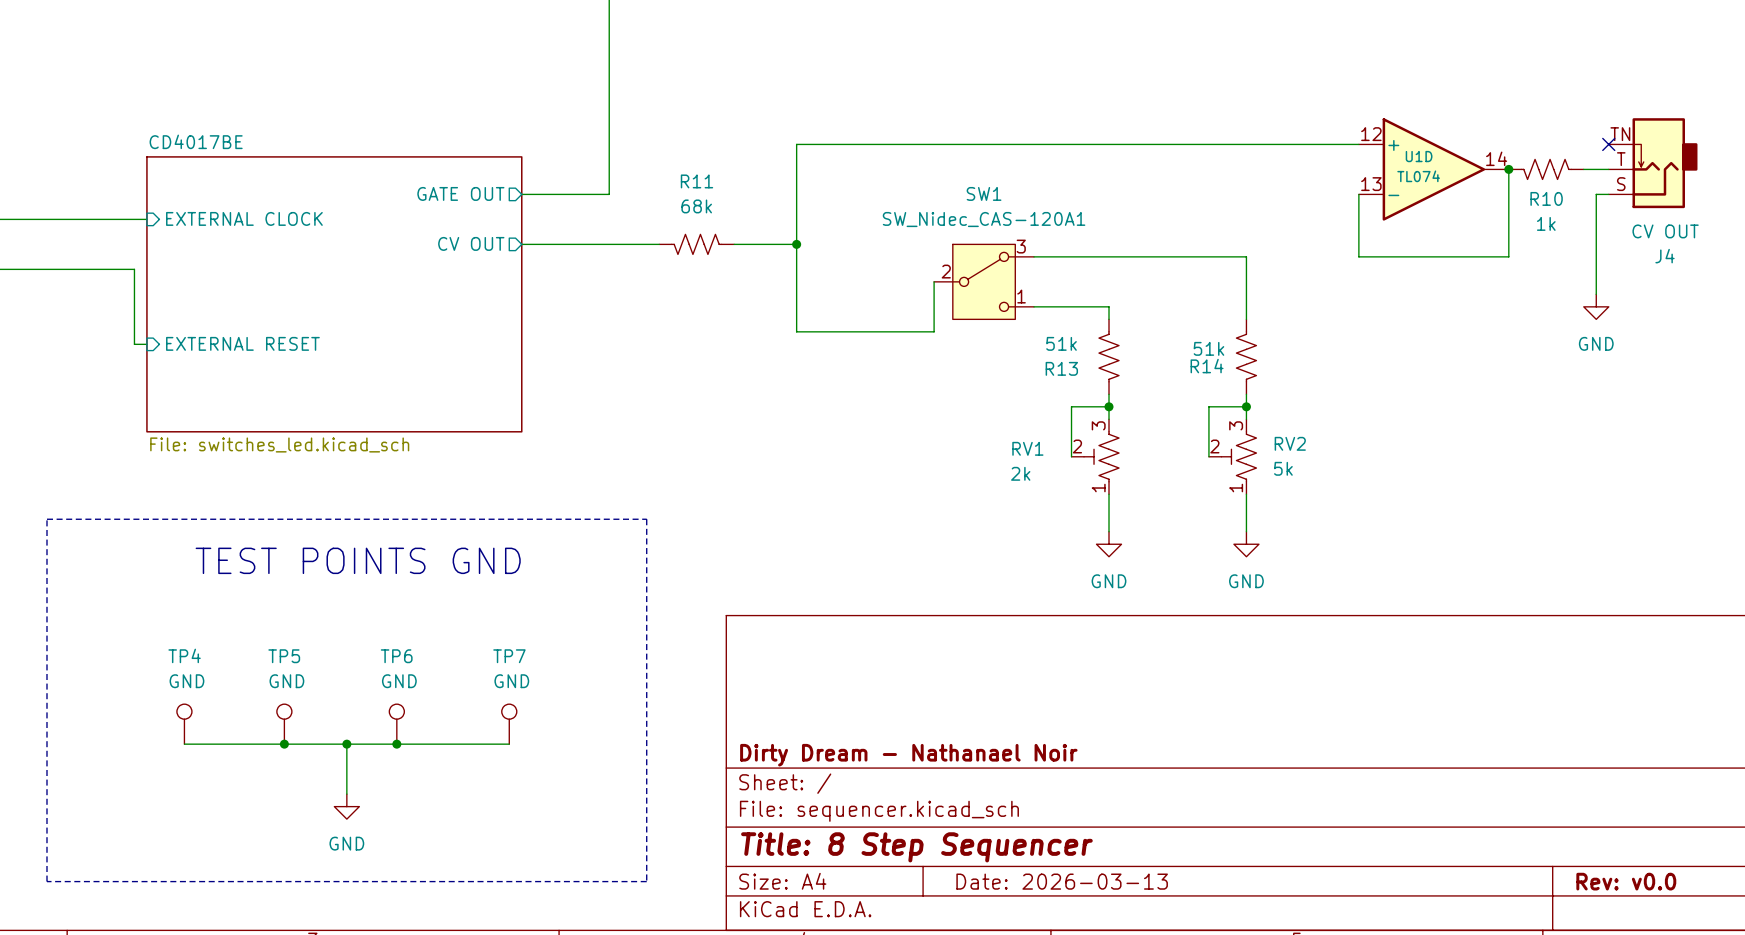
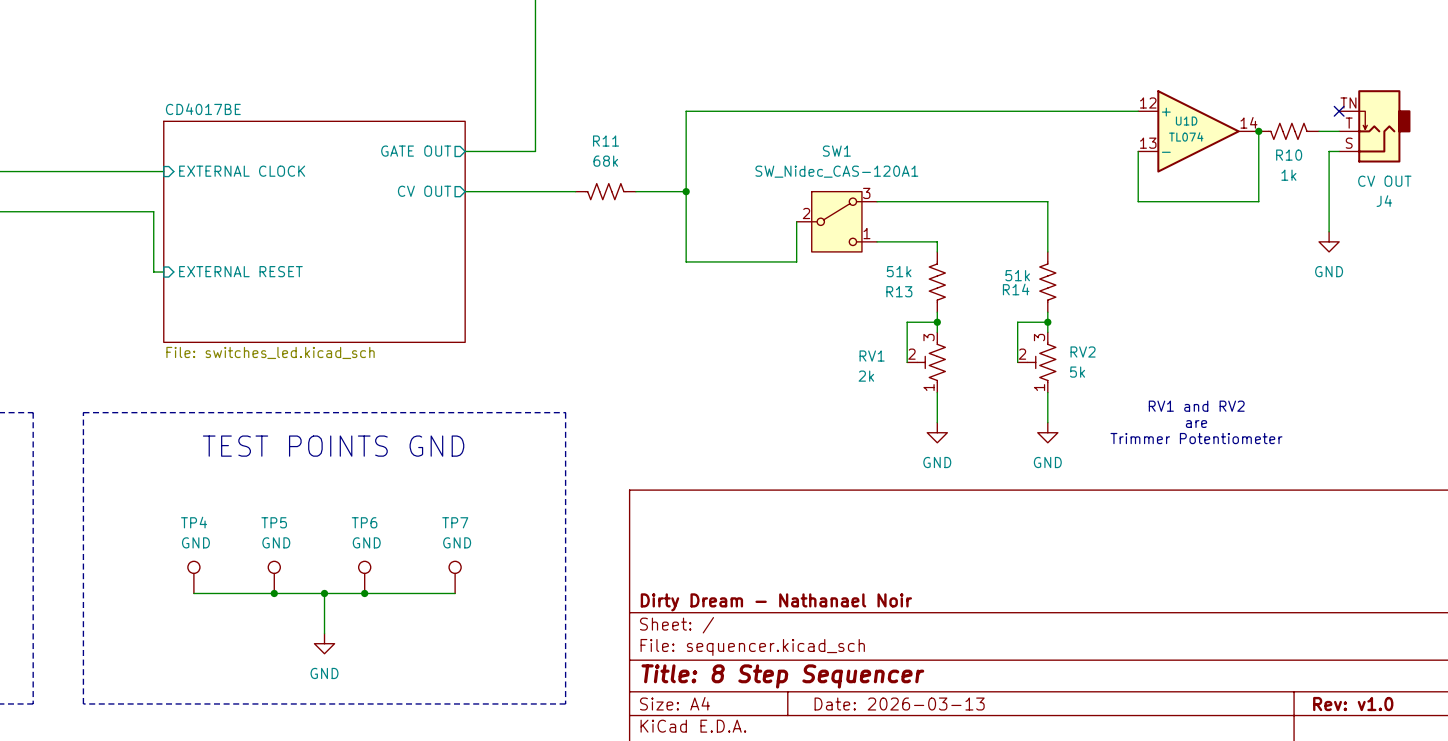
text: none -> RV1 and RV2 (1196, 406)
text: none -> are (1196, 424)
text: none -> Trimmer Potentiometer (1196, 438)
title block: Rev: v0.0 (1626, 881) -> Rev: v1.0 (1353, 704)

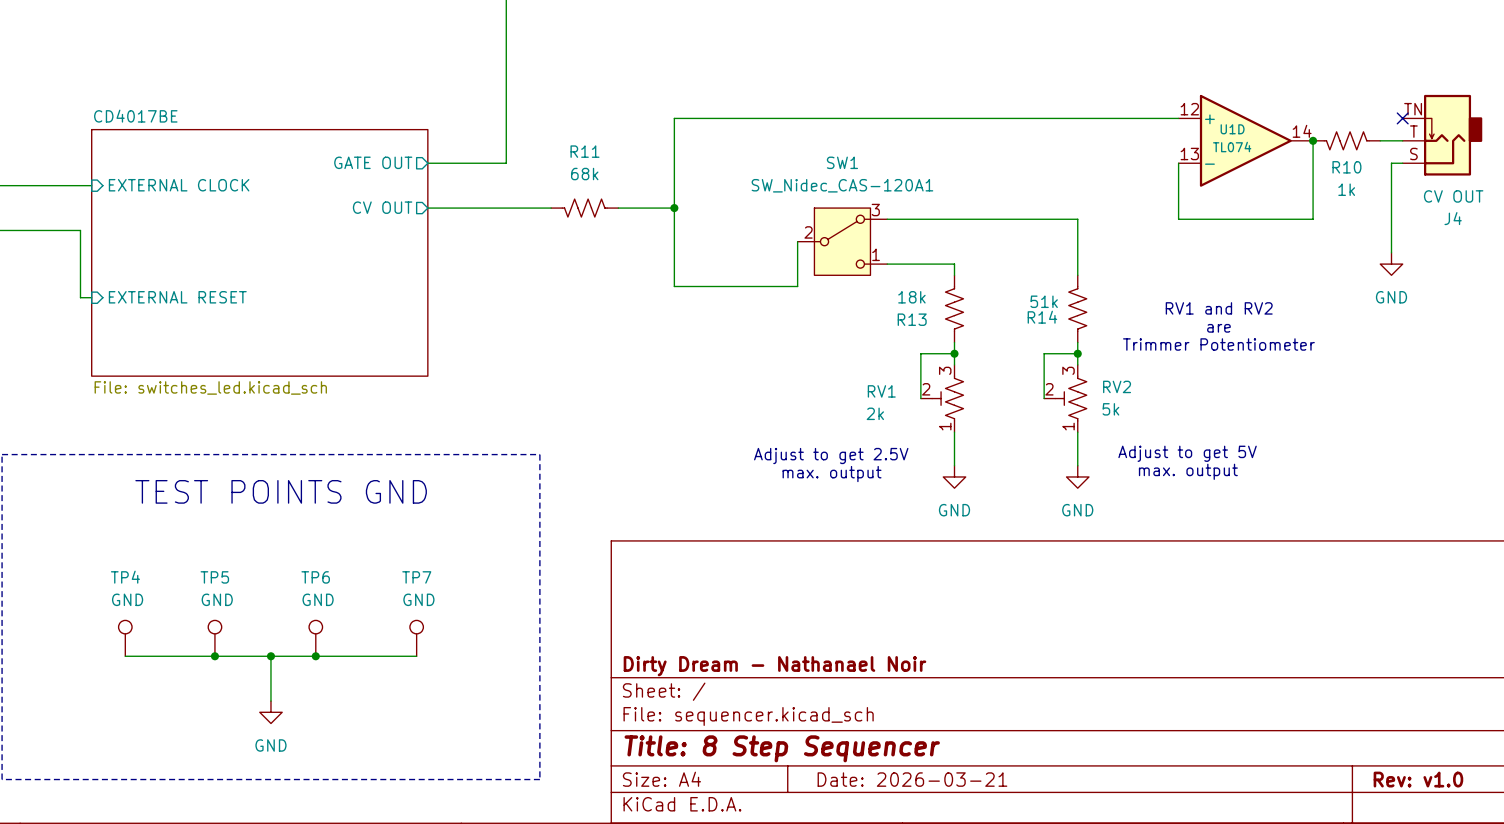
R13 value: 51k (899, 271) -> 18k (911, 297)
text position: RV1 and RV2 (1196, 406) -> RV1 and RV2 (1219, 308)
text: none -> Adjust to get 5V (1187, 453)
text: none -> Adjust to get 2.5V (831, 456)
text position: are (1196, 424) -> are (1218, 328)
text: none -> max. output (1188, 471)
text: none -> max. output (832, 474)
text position: Trimmer Potentiometer (1196, 438) -> Trimmer Potentiometer (1218, 344)
title block: Date: 2026-03-13 (899, 704) -> Date: 2026-03-21 (912, 779)

